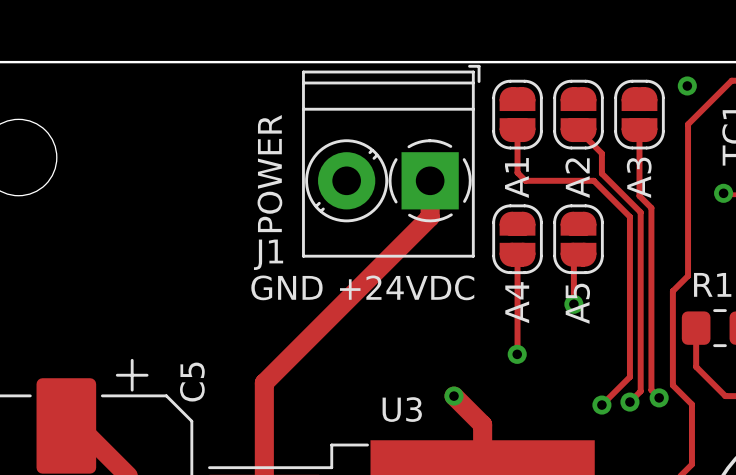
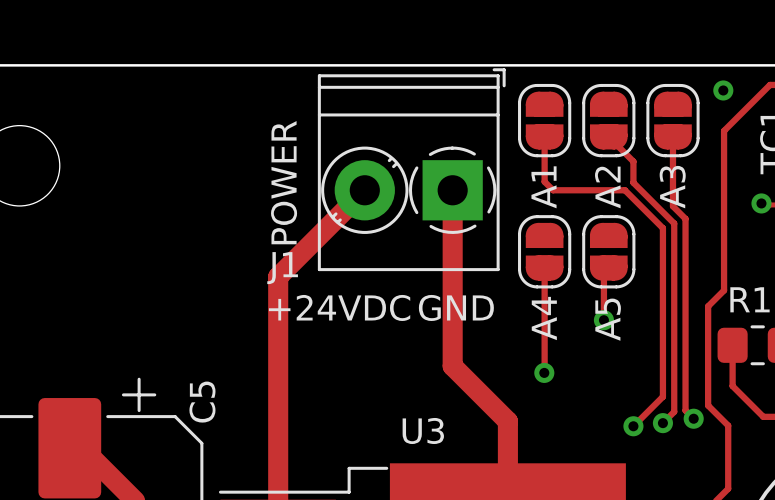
track: (430, 217) (264, 382) -> (364, 190) (278, 276) (278, 403)
text position: GND (286, 287) -> GND (456, 307)
text position: +24VDC (407, 287) -> +24VDC (339, 307)
track: (454, 396) (482, 424) -> (452, 228) (452, 366) (507, 421) (507, 446)
via: (454, 396) -> none

